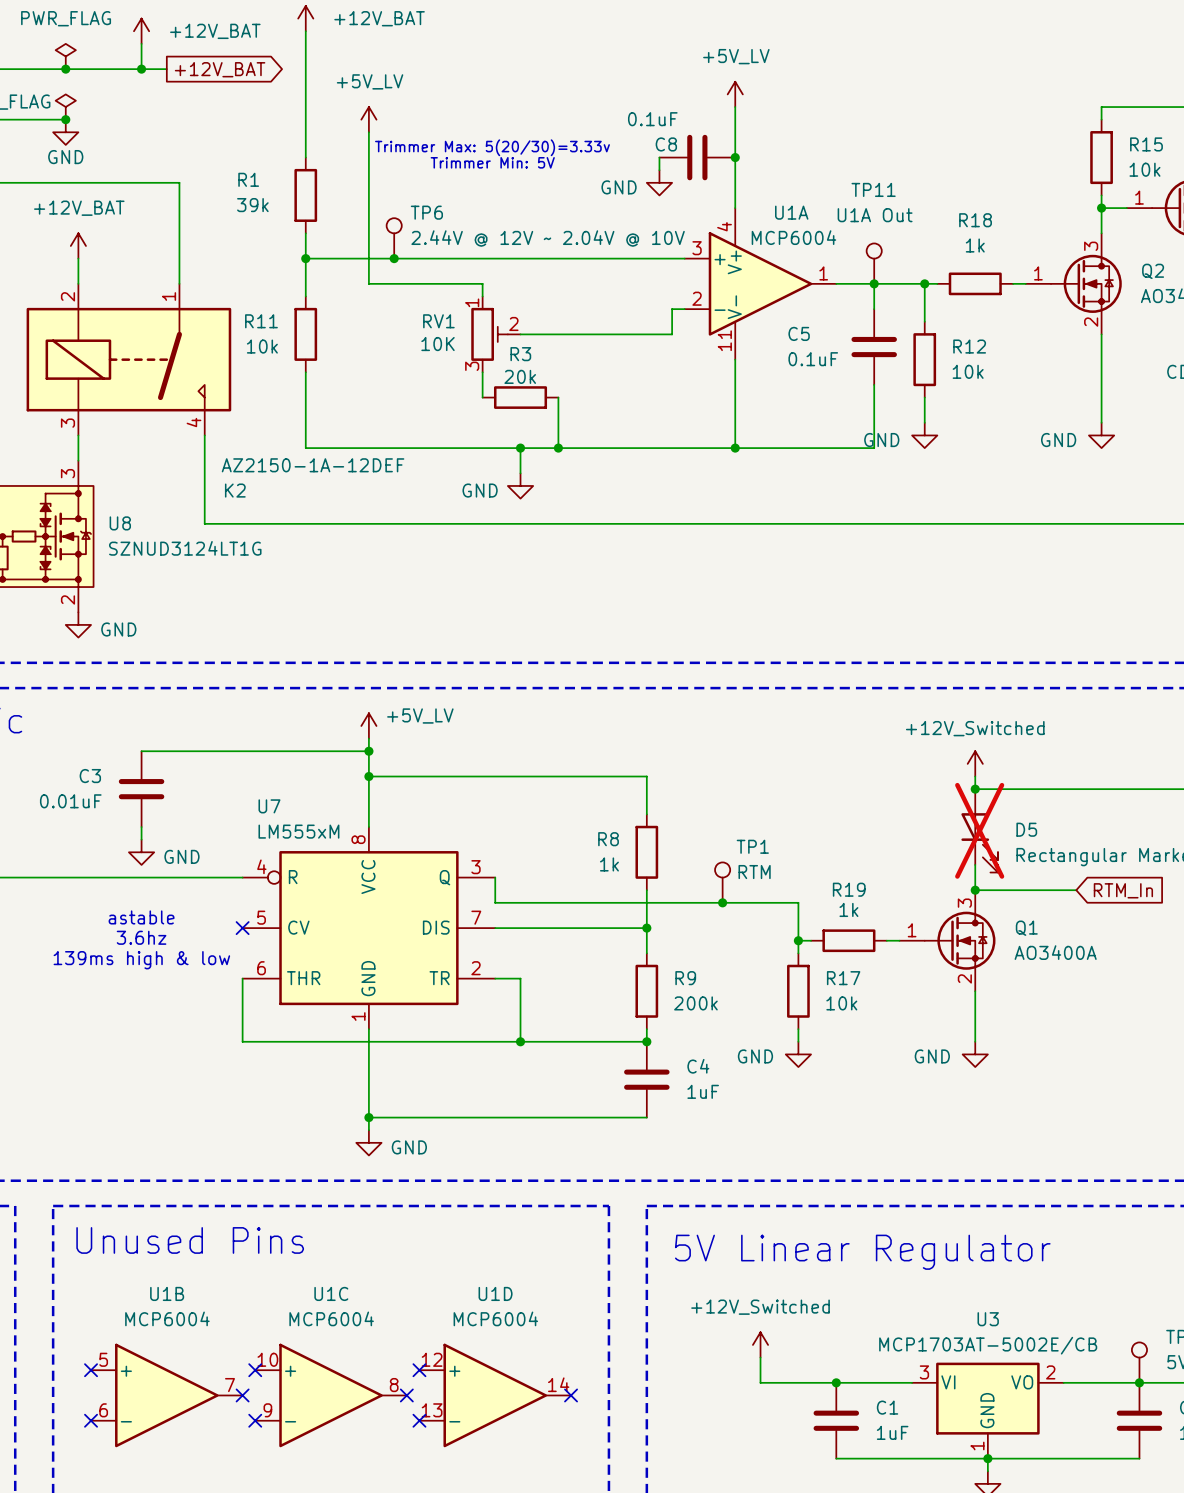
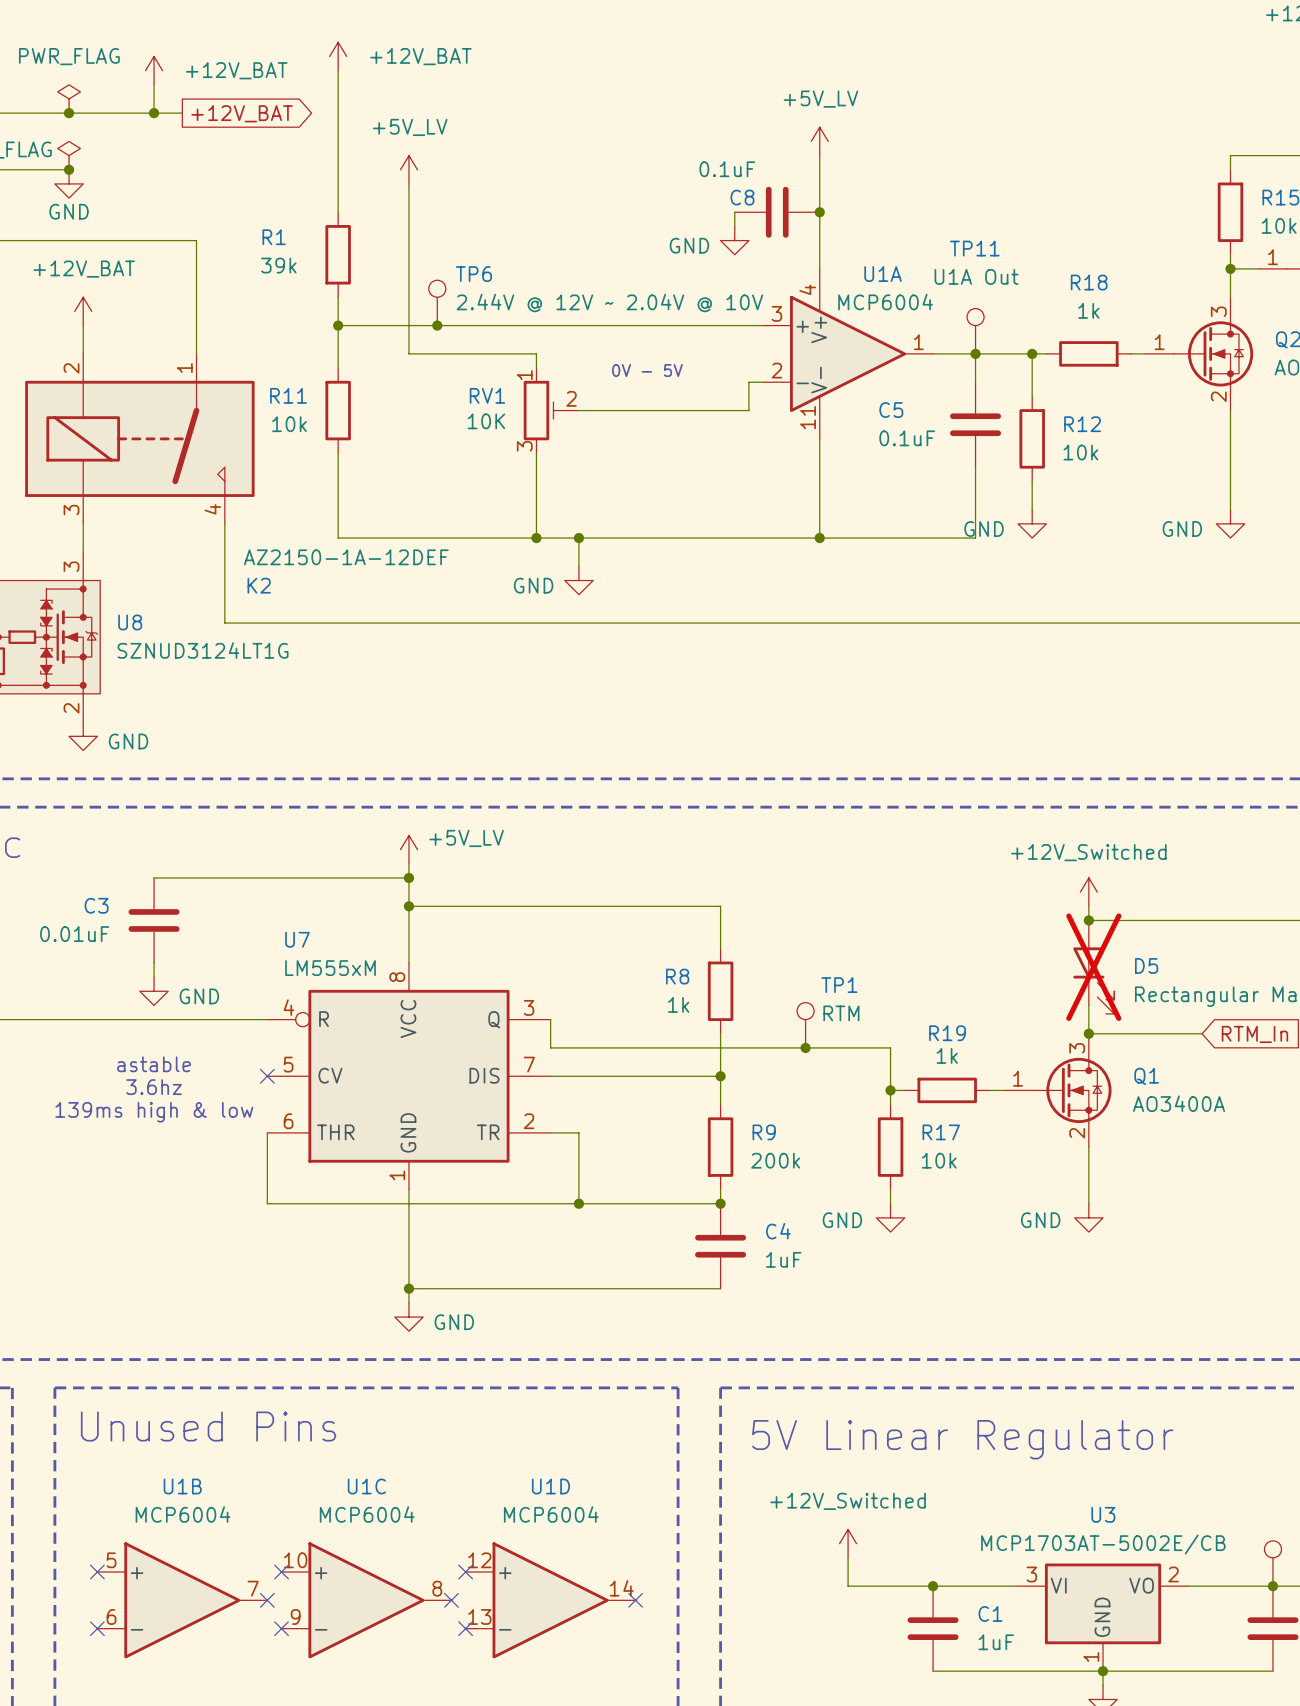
text: Trimmer Max: 5(20/30)=3.33v (492, 147) -> none
text: Trimmer Min: 5V (492, 162) -> none
text: none -> 0V - 5V (647, 370)
R3: 20k (520, 397) -> none
wire: (558, 397) (558, 448) -> (536, 481) (536, 538)
junction: none -> (536, 538)
junction: (558, 448) -> none

